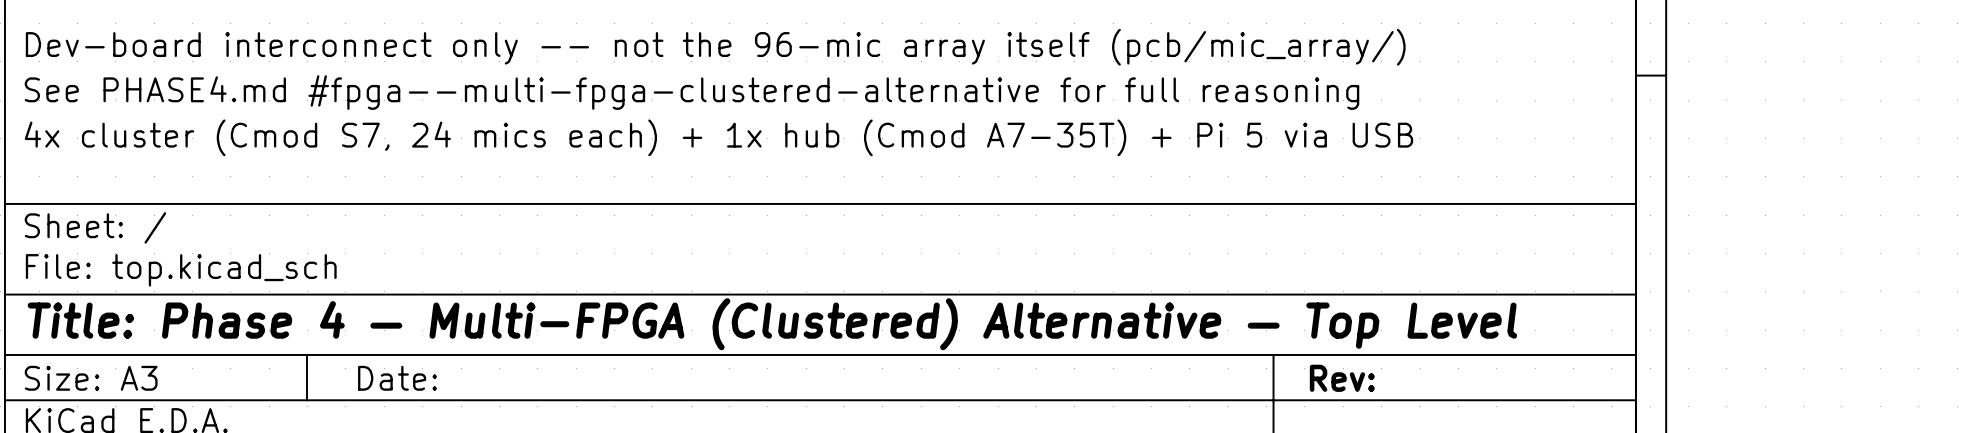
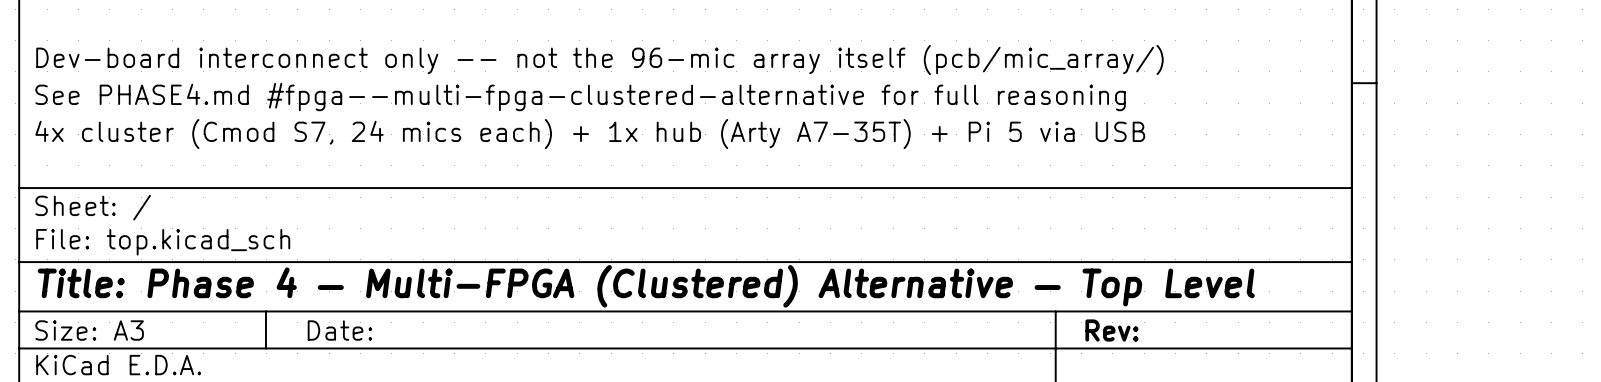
title block: 4x cluster (Cmod S7, 24 mics each) + 1x hub (Cmod A7-35T) + Pi 5 via USB (718, 137) -> 4x cluster (Cmod S7, 24 mics each) + 1x hub (Arty A7-35T) + Pi 5 via USB (590, 134)

